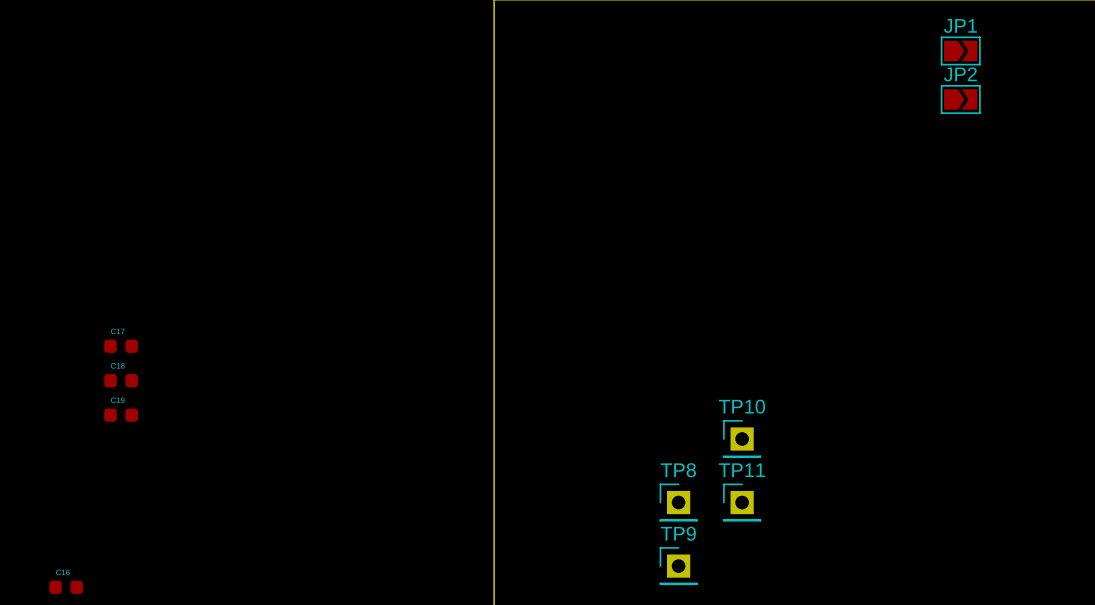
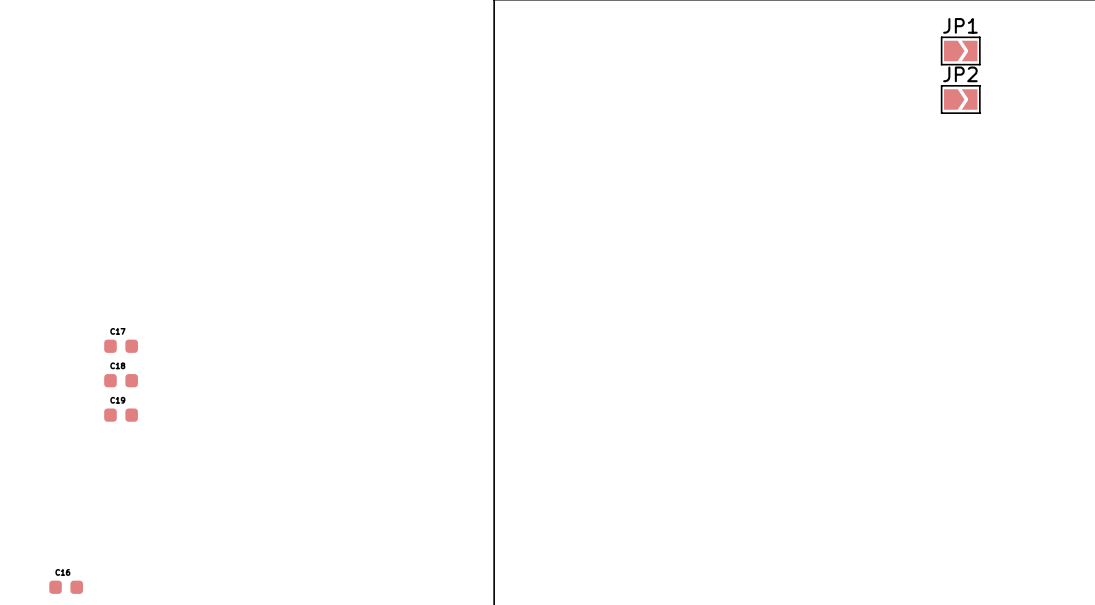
TP10: (742, 439) -> none
TP8: (678, 502) -> none
TP11: (742, 502) -> none
TP9: (678, 566) -> none

